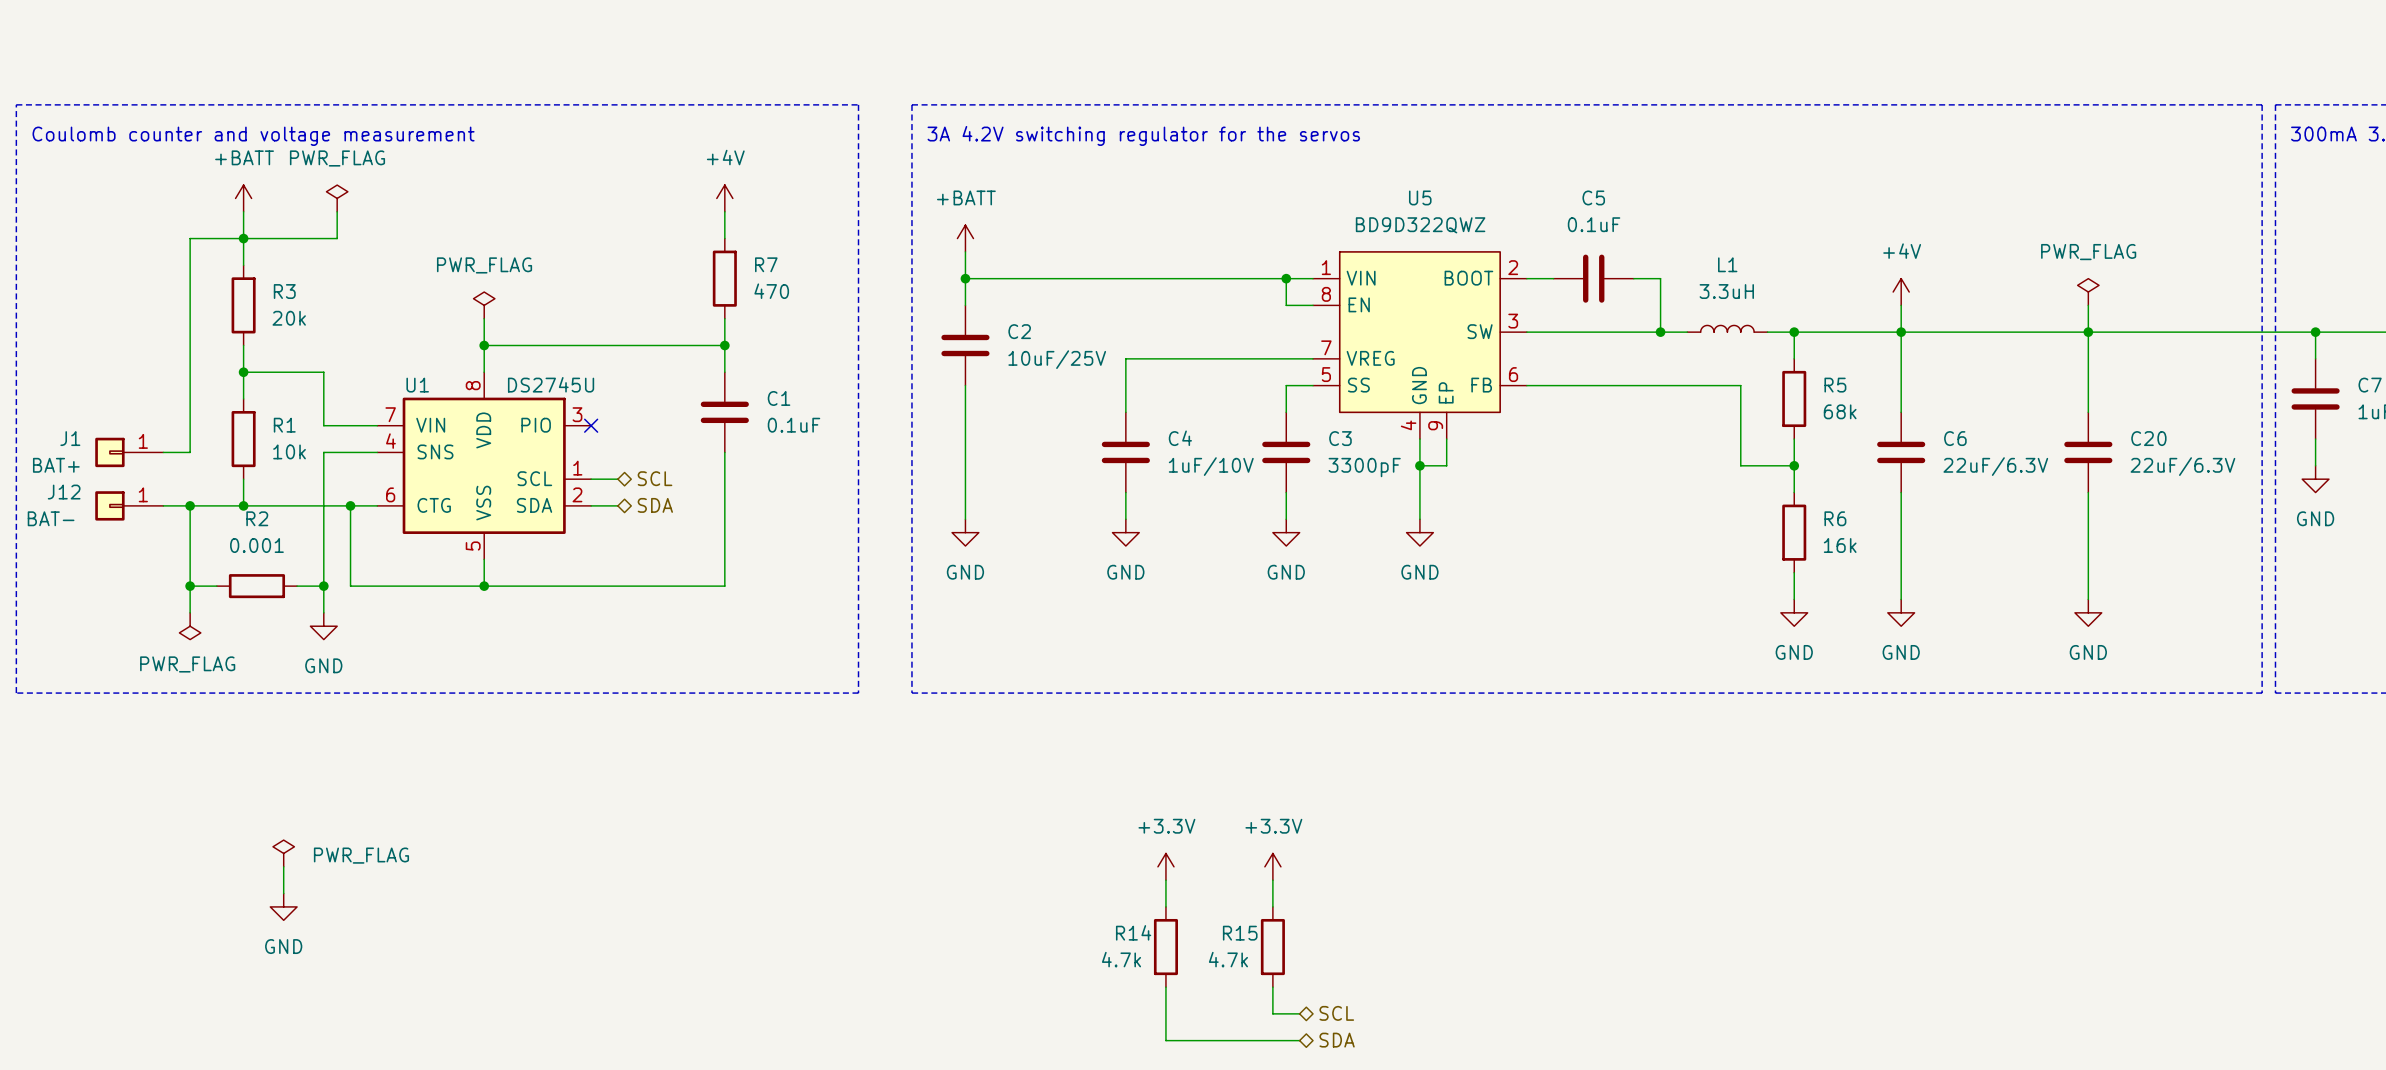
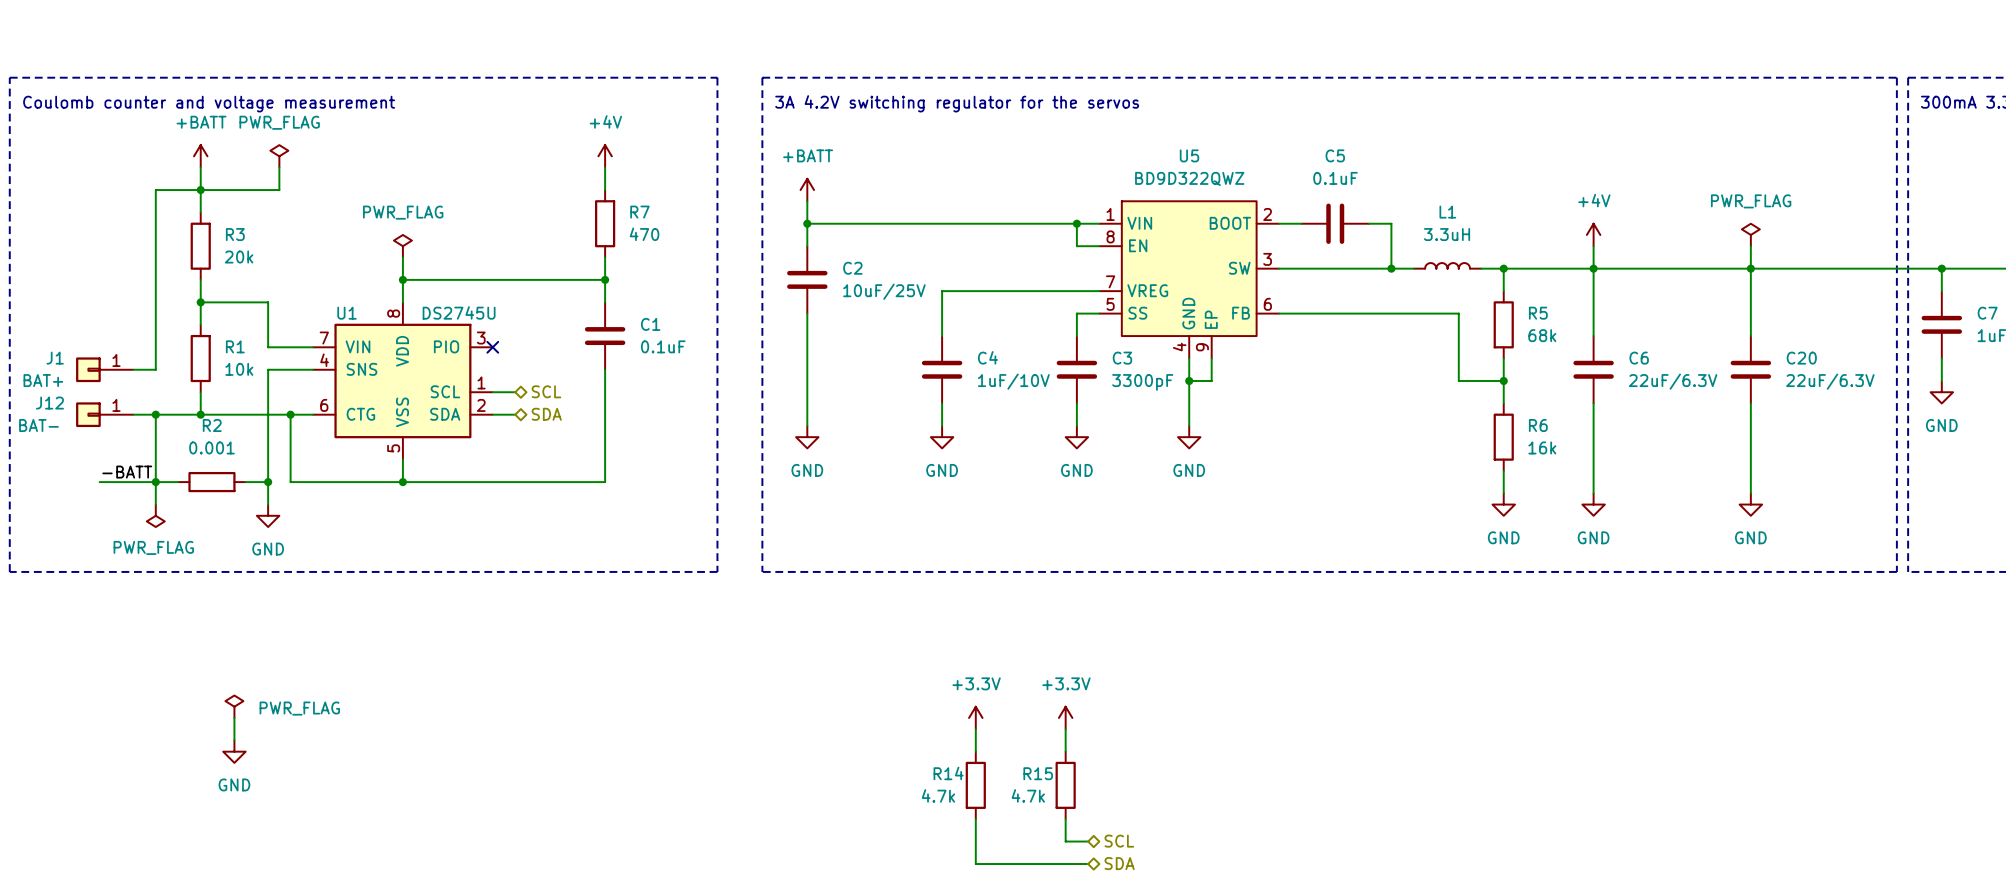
label: none -> -BATT (127, 472)
wire: none -> (99, 482) (155, 482)

